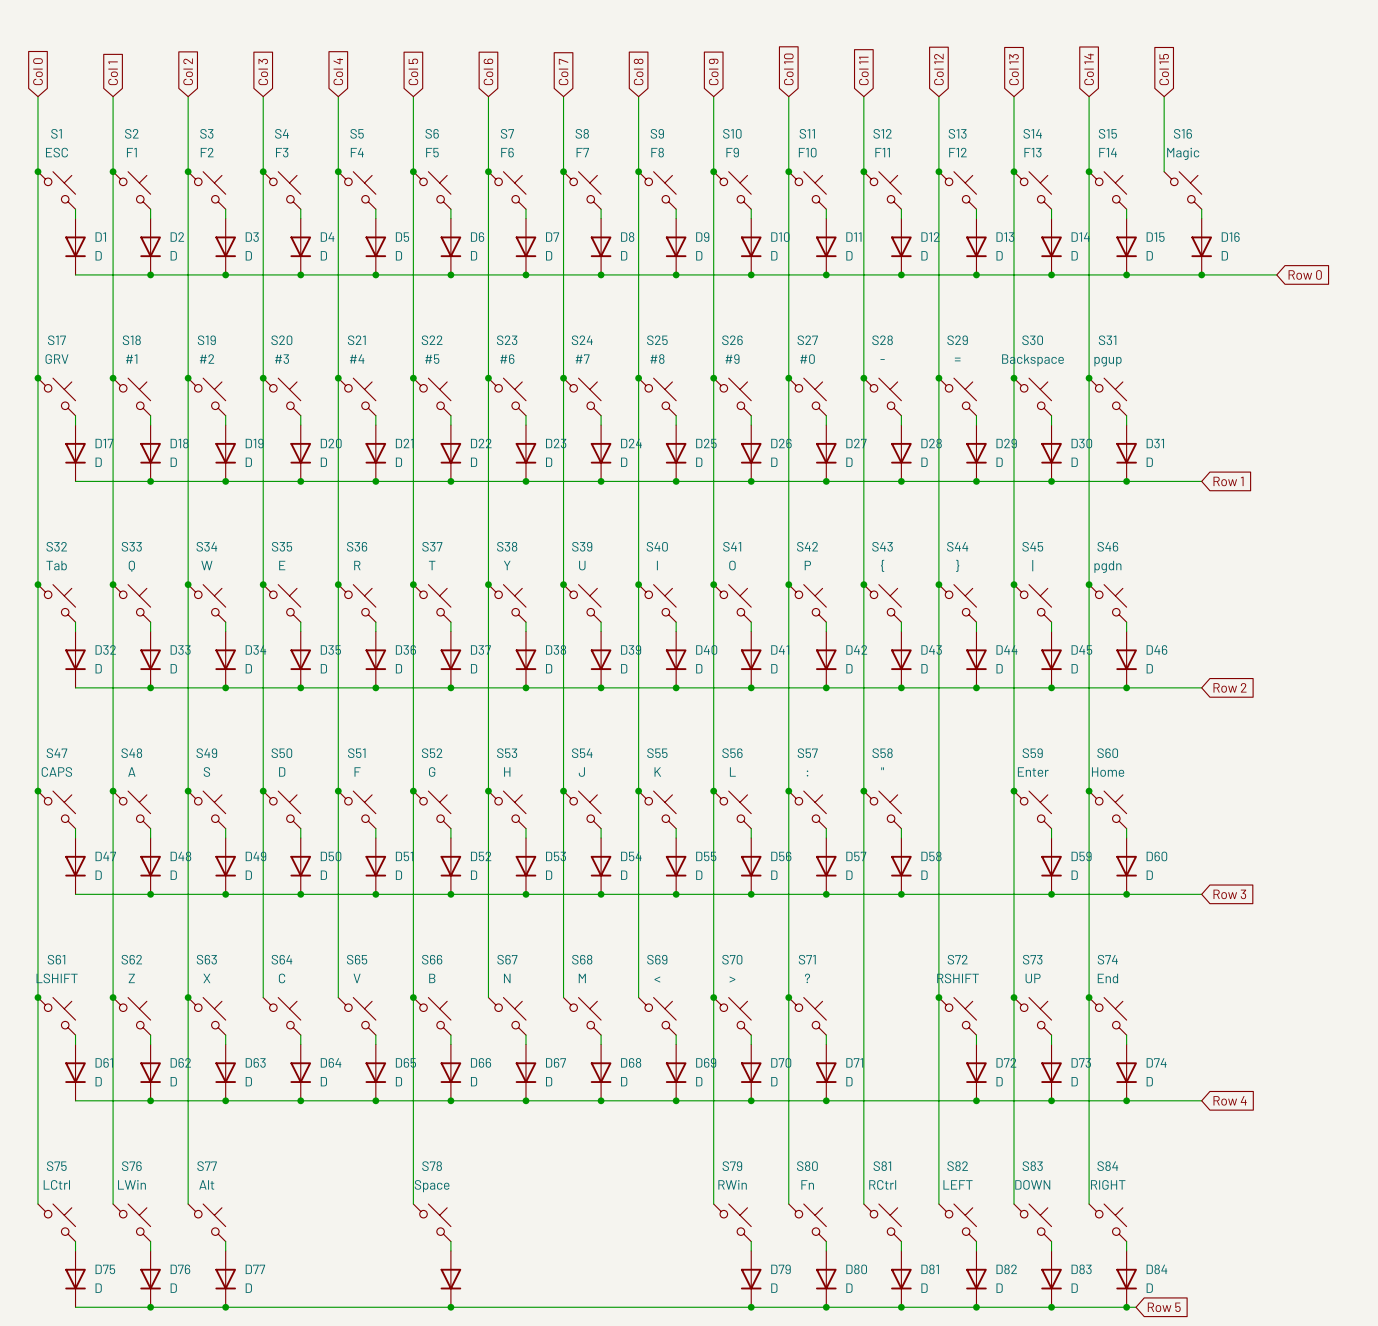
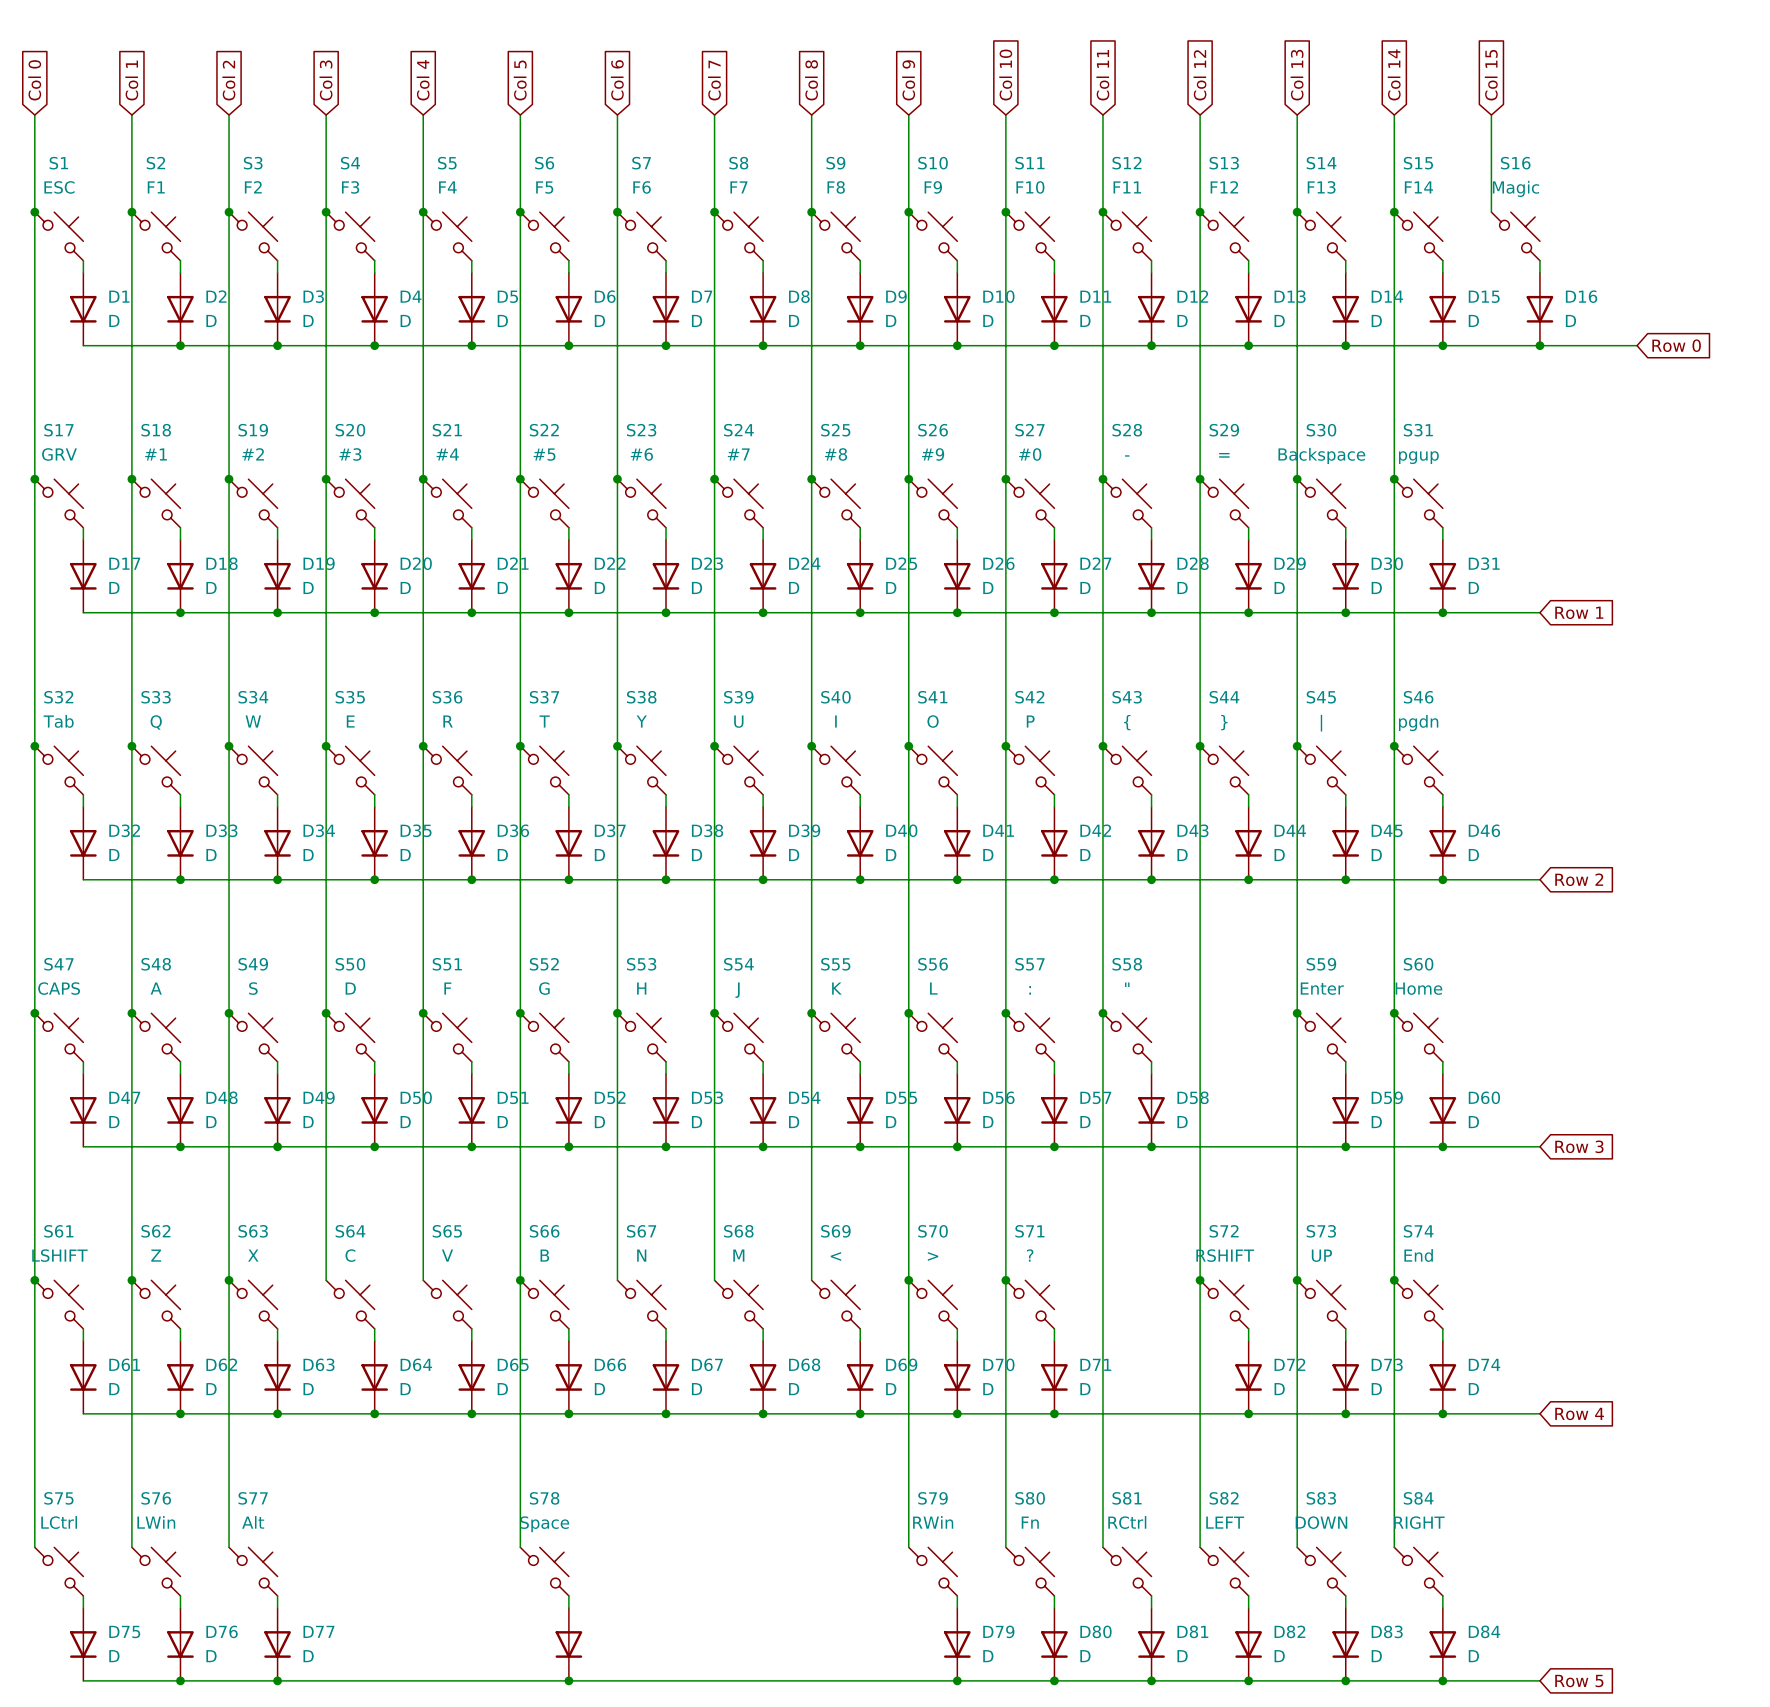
wire: none -> (1454, 1680) (1539, 1680)
global label position: Row 5 (1164, 1307) -> Row 5 (1579, 1681)

